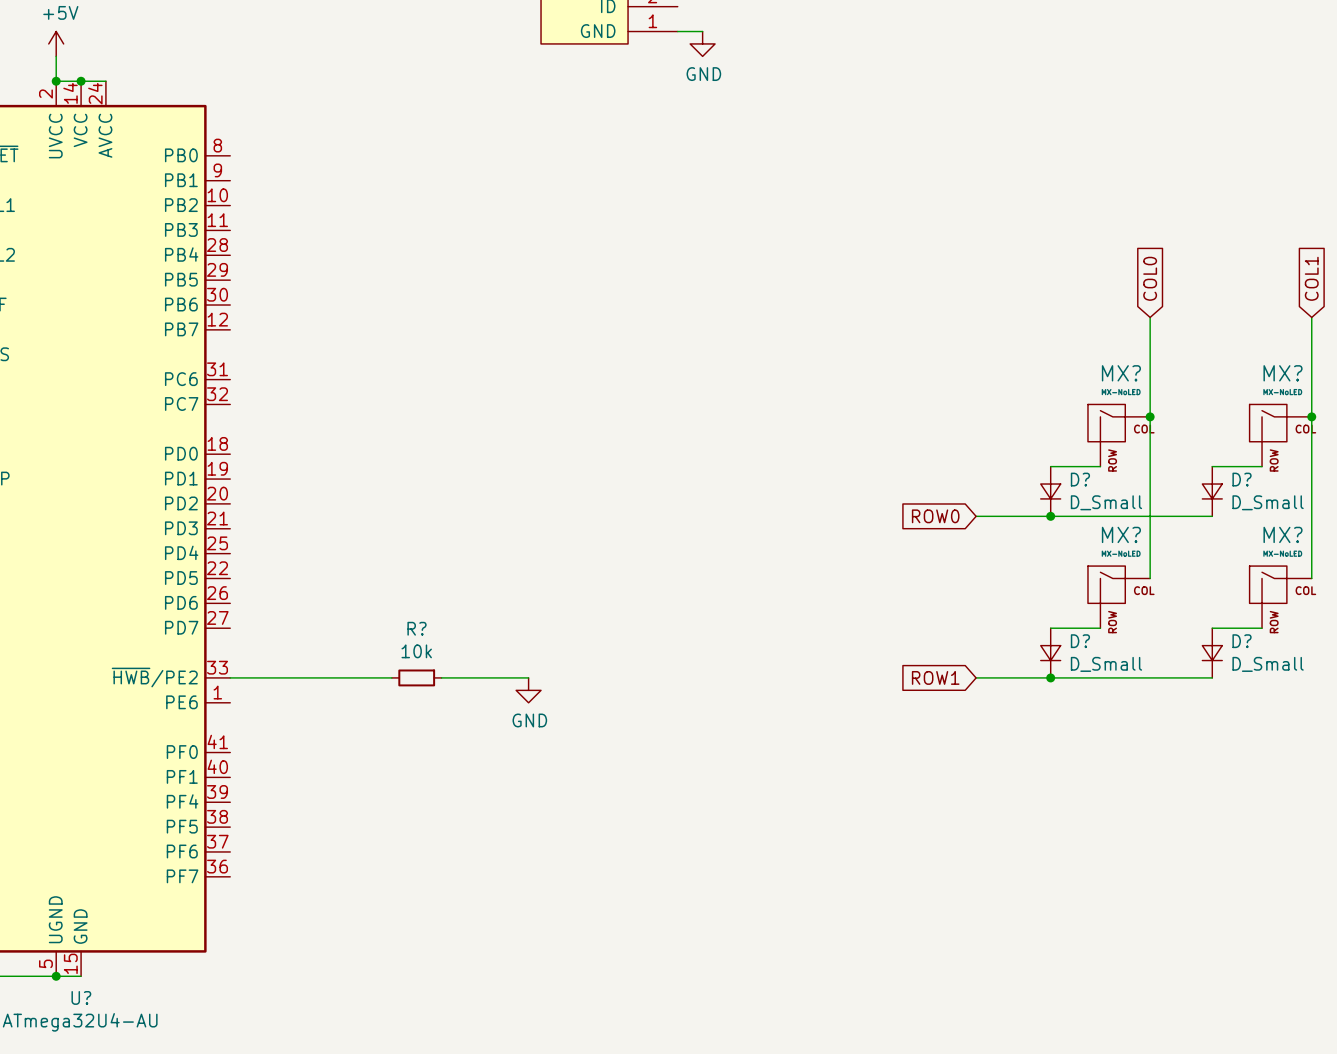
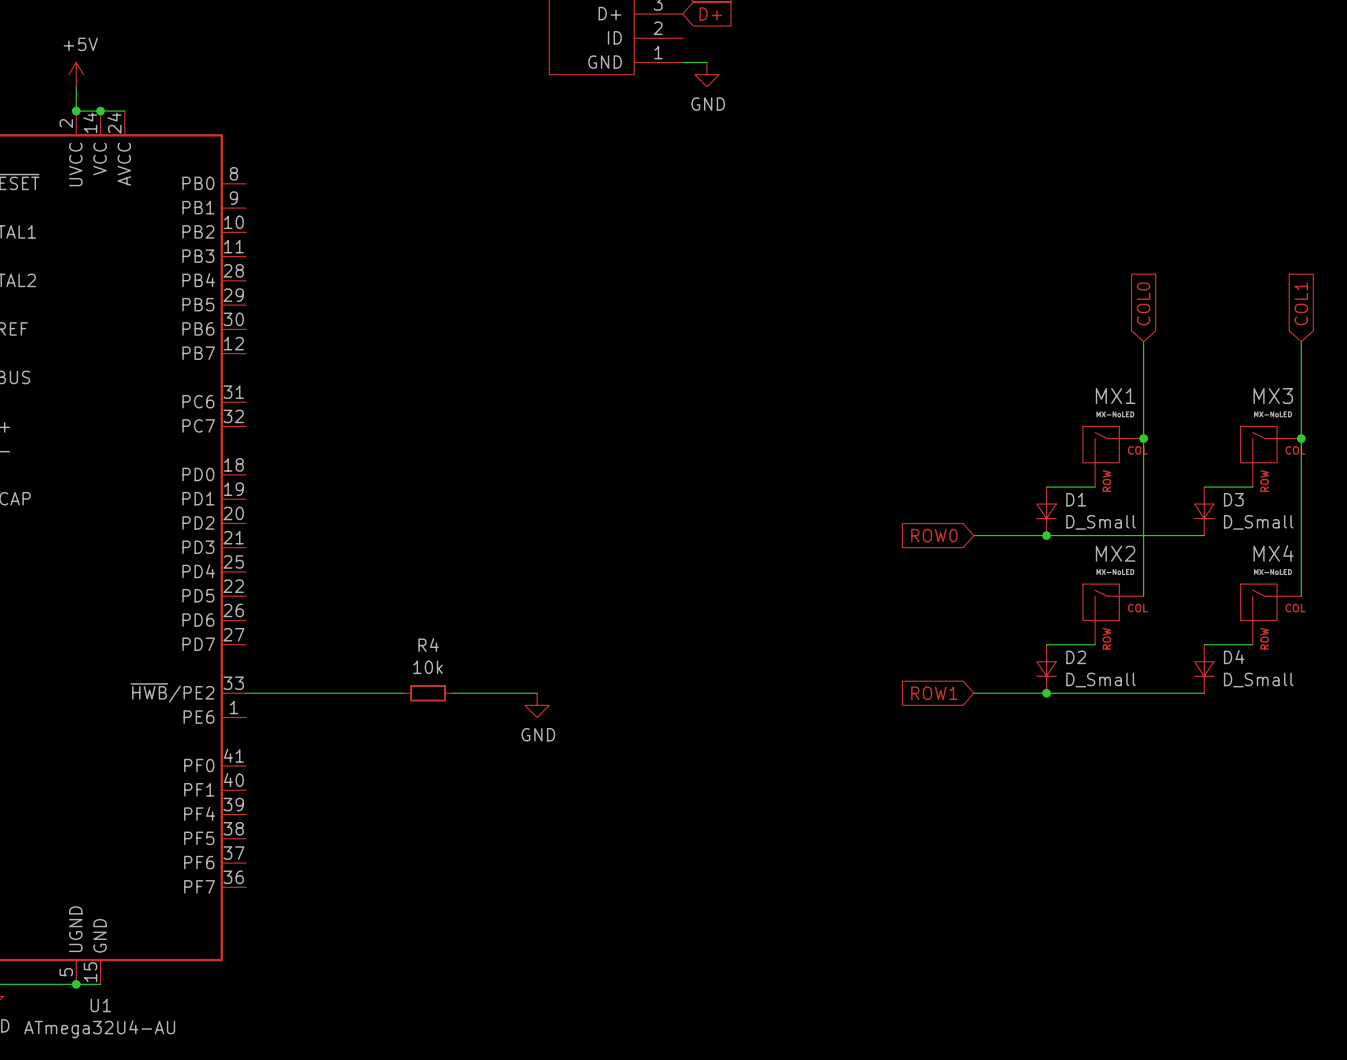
MX? name: MX? (1121, 373) -> MX1 (1115, 396)
MX? name: MX? (1283, 373) -> MX3 (1273, 396)
D? name: D? (1080, 479) -> D1 (1076, 499)
D? name: D? (1242, 479) -> D3 (1233, 499)
MX? name: MX? (1121, 534) -> MX2 (1115, 553)
MX? name: MX? (1283, 534) -> MX4 (1273, 553)
R? name: R? (417, 628) -> R4 (428, 644)
D? name: D? (1080, 641) -> D2 (1076, 657)
D? name: D? (1242, 641) -> D4 (1234, 657)
U? name: U? (81, 997) -> U1 (100, 1005)

